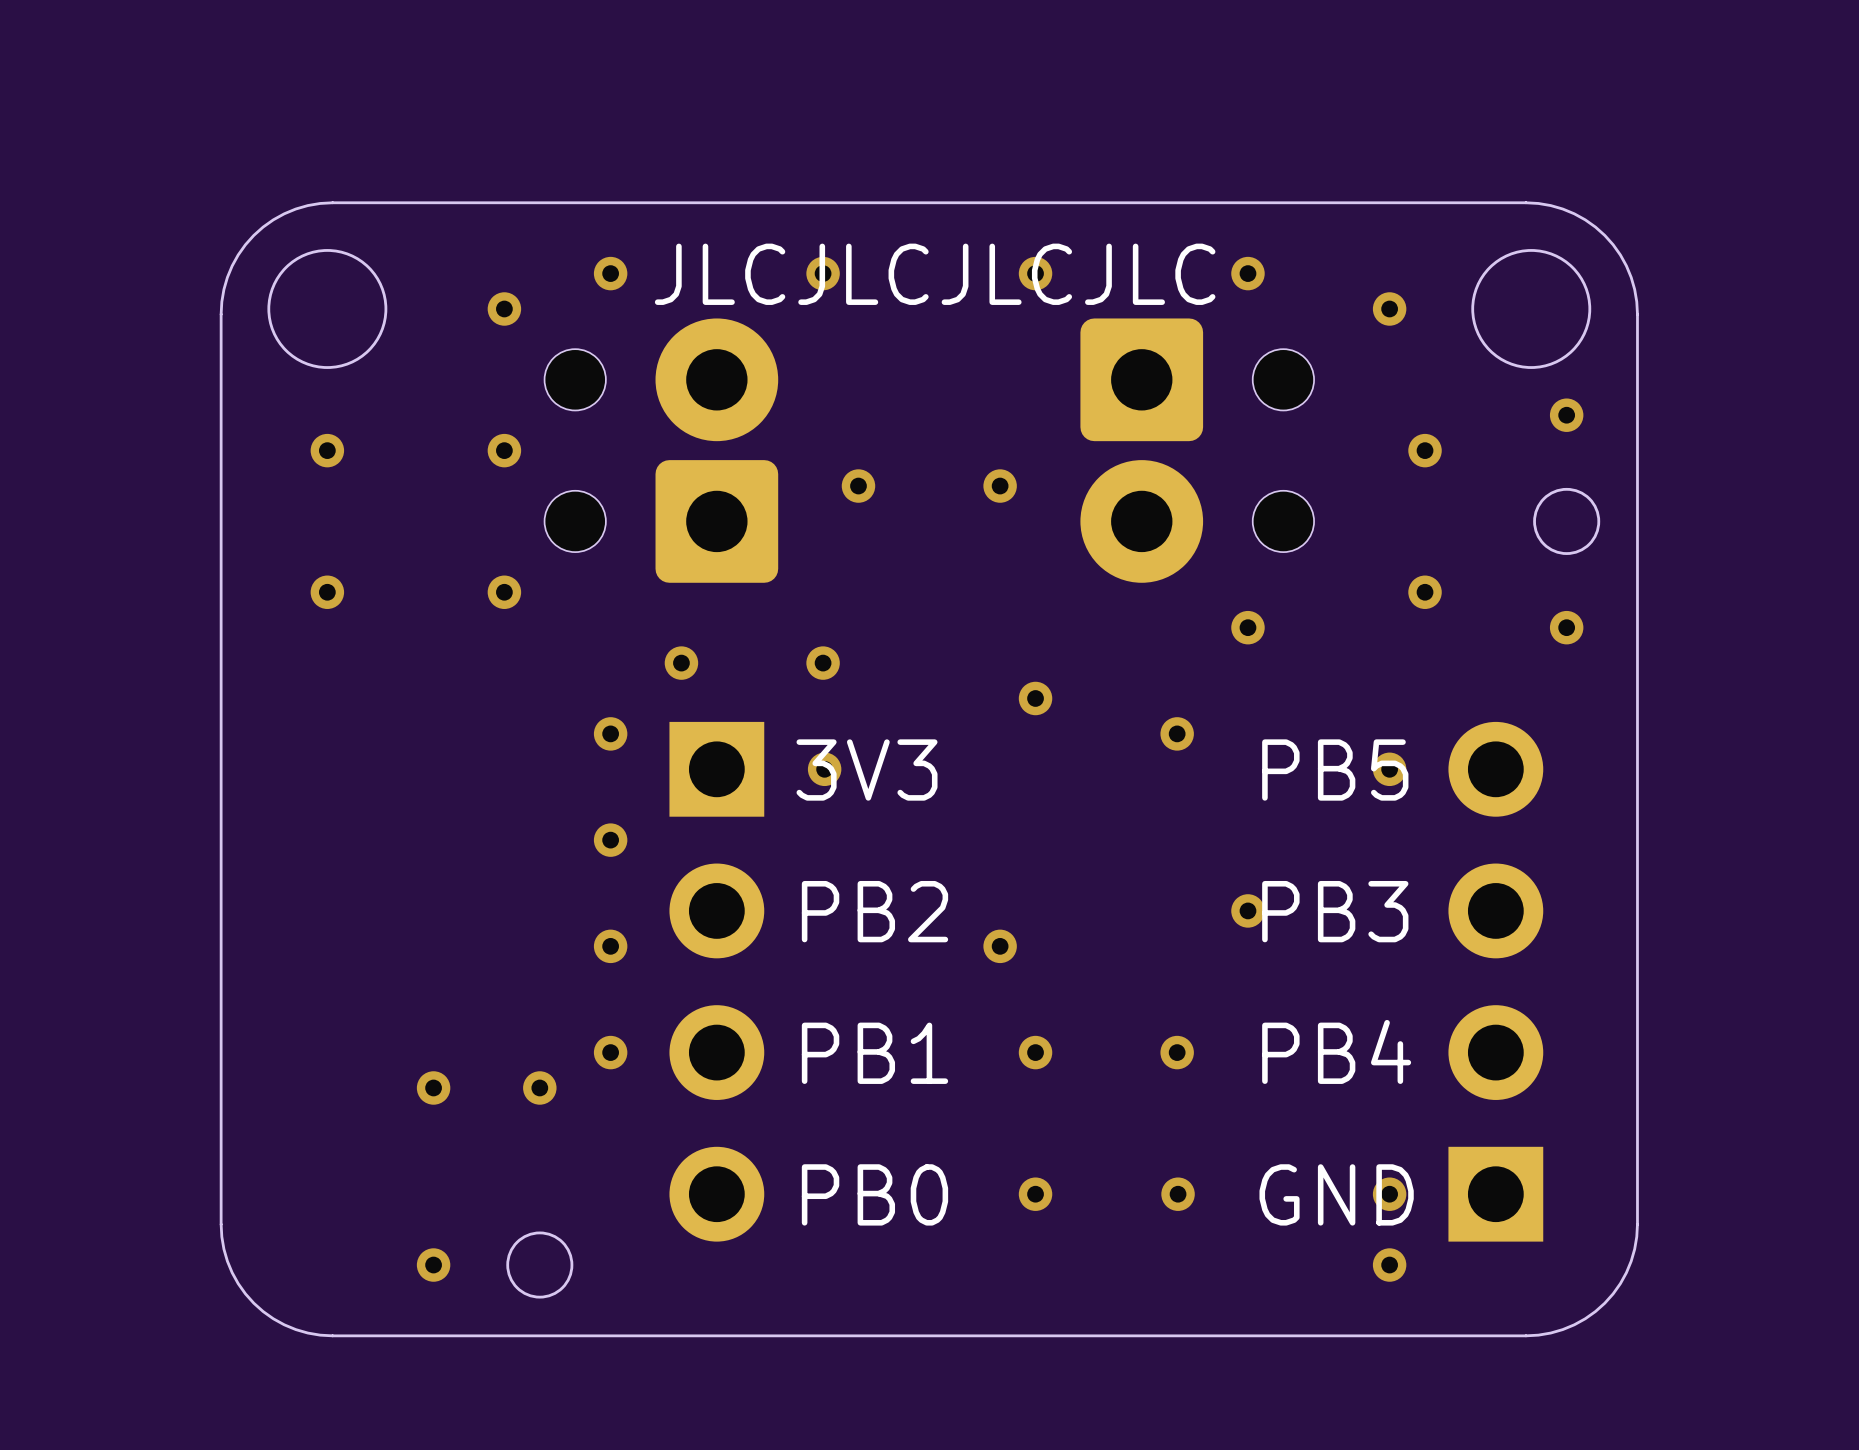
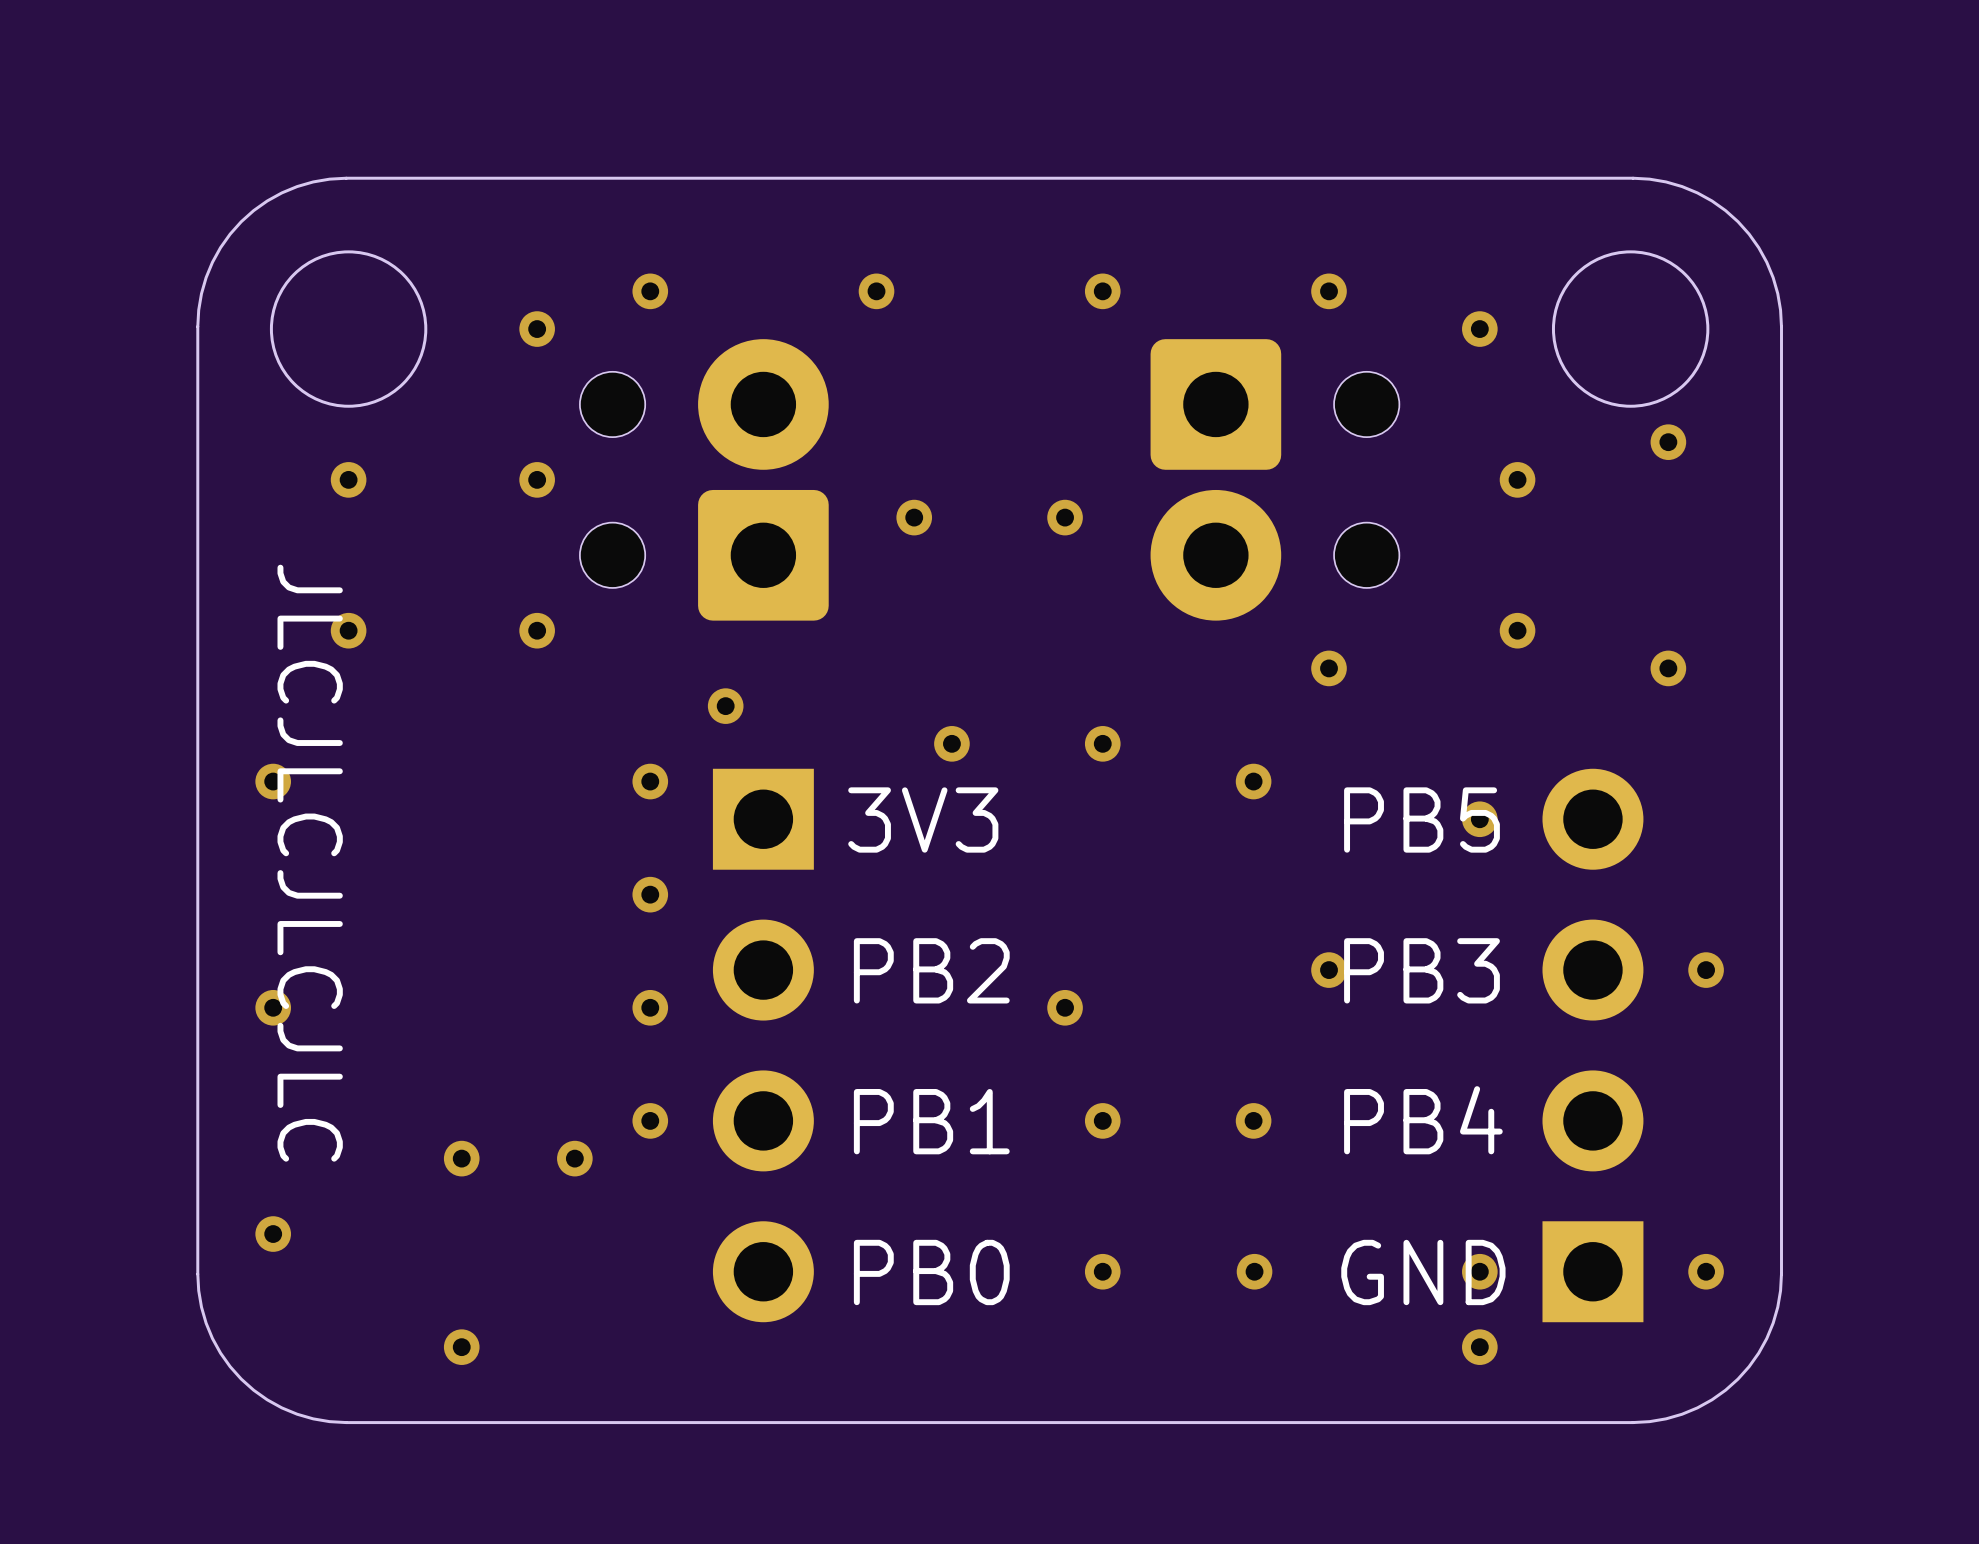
round board edge size: [267, 249, 388, 369] -> [269, 250, 428, 408]
round board edge size: [1471, 249, 1592, 369] -> [1551, 250, 1710, 408]
text rotation: 0° (935, 274) -> 90° clockwise (310, 863)
text position: JLCJLCJLCJLC (935, 274) -> JLCJLCJLCJLC (310, 863)
round board edge: [1533, 487, 1601, 555] -> none
via: (823, 663) -> none
via: none -> (951, 743)
via: none -> (273, 781)
via: (824, 769) -> none
via: none -> (1706, 970)
via: none -> (273, 1007)
via: none -> (273, 1234)
via: none -> (1706, 1271)
round board edge: [506, 1231, 574, 1299] -> none
board edge: (1525, 1335) (1550, 1333) (1574, 1324) (1604, 1303) (1620, 1283) (1631, 1261) (1637, 1224) (1636, 301) (1626, 265) (1604, 235) (1585, 219) (1562, 209) (1525, 202) (332, 202) (307, 205) (284, 213) (253, 235) (232, 265) (223, 289) (221, 314) (221, 1236) (232, 1272) (253, 1303) (284, 1324) (307, 1333) (332, 1335) -> (1625, 1422) (1649, 1421) (1682, 1414) (1712, 1399) (1738, 1379) (1749, 1366) (1766, 1338) (1777, 1307) (1781, 1274) (1780, 310) (1773, 277) (1758, 247) (1738, 221) (1725, 210) (1697, 192) (1682, 186) (1649, 179) (1633, 178) (346, 178) (313, 181) (281, 192) (253, 210) (241, 221) (230, 234) (212, 262) (201, 293) (197, 326) (198, 1290) (206, 1323) (220, 1353) (241, 1379) (253, 1390) (281, 1407) (297, 1414) (329, 1421) (354, 1422)

